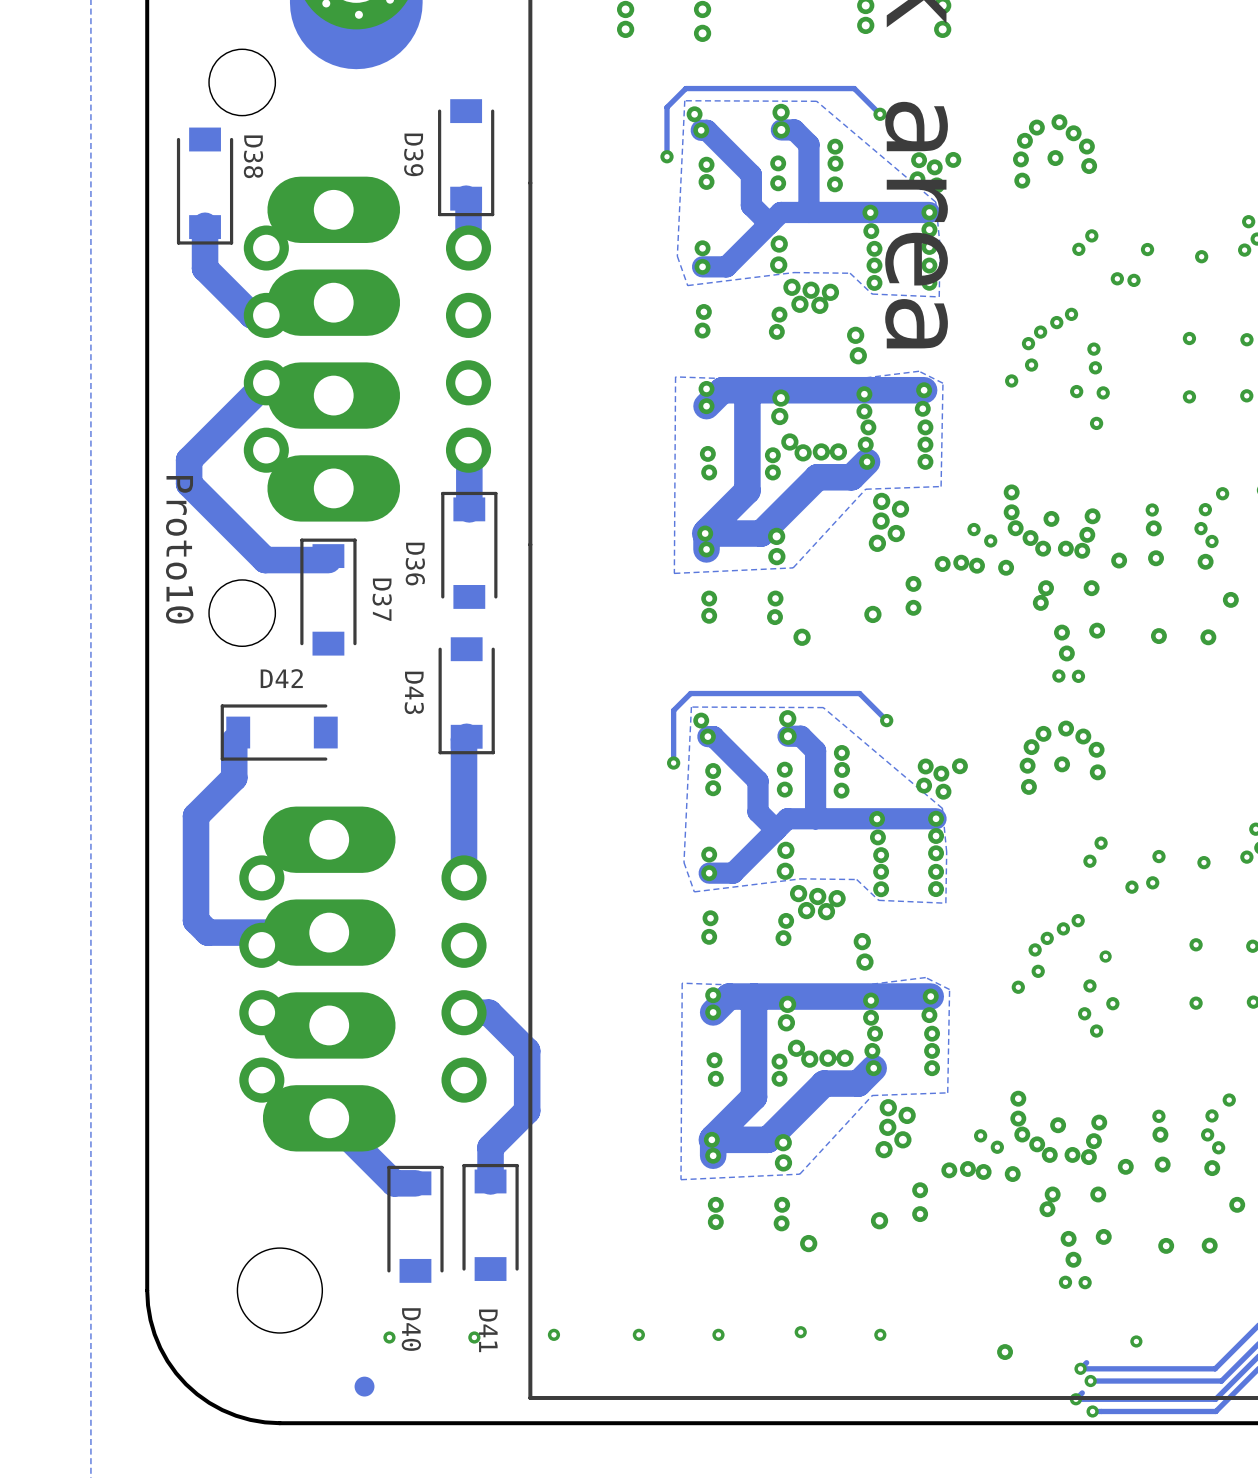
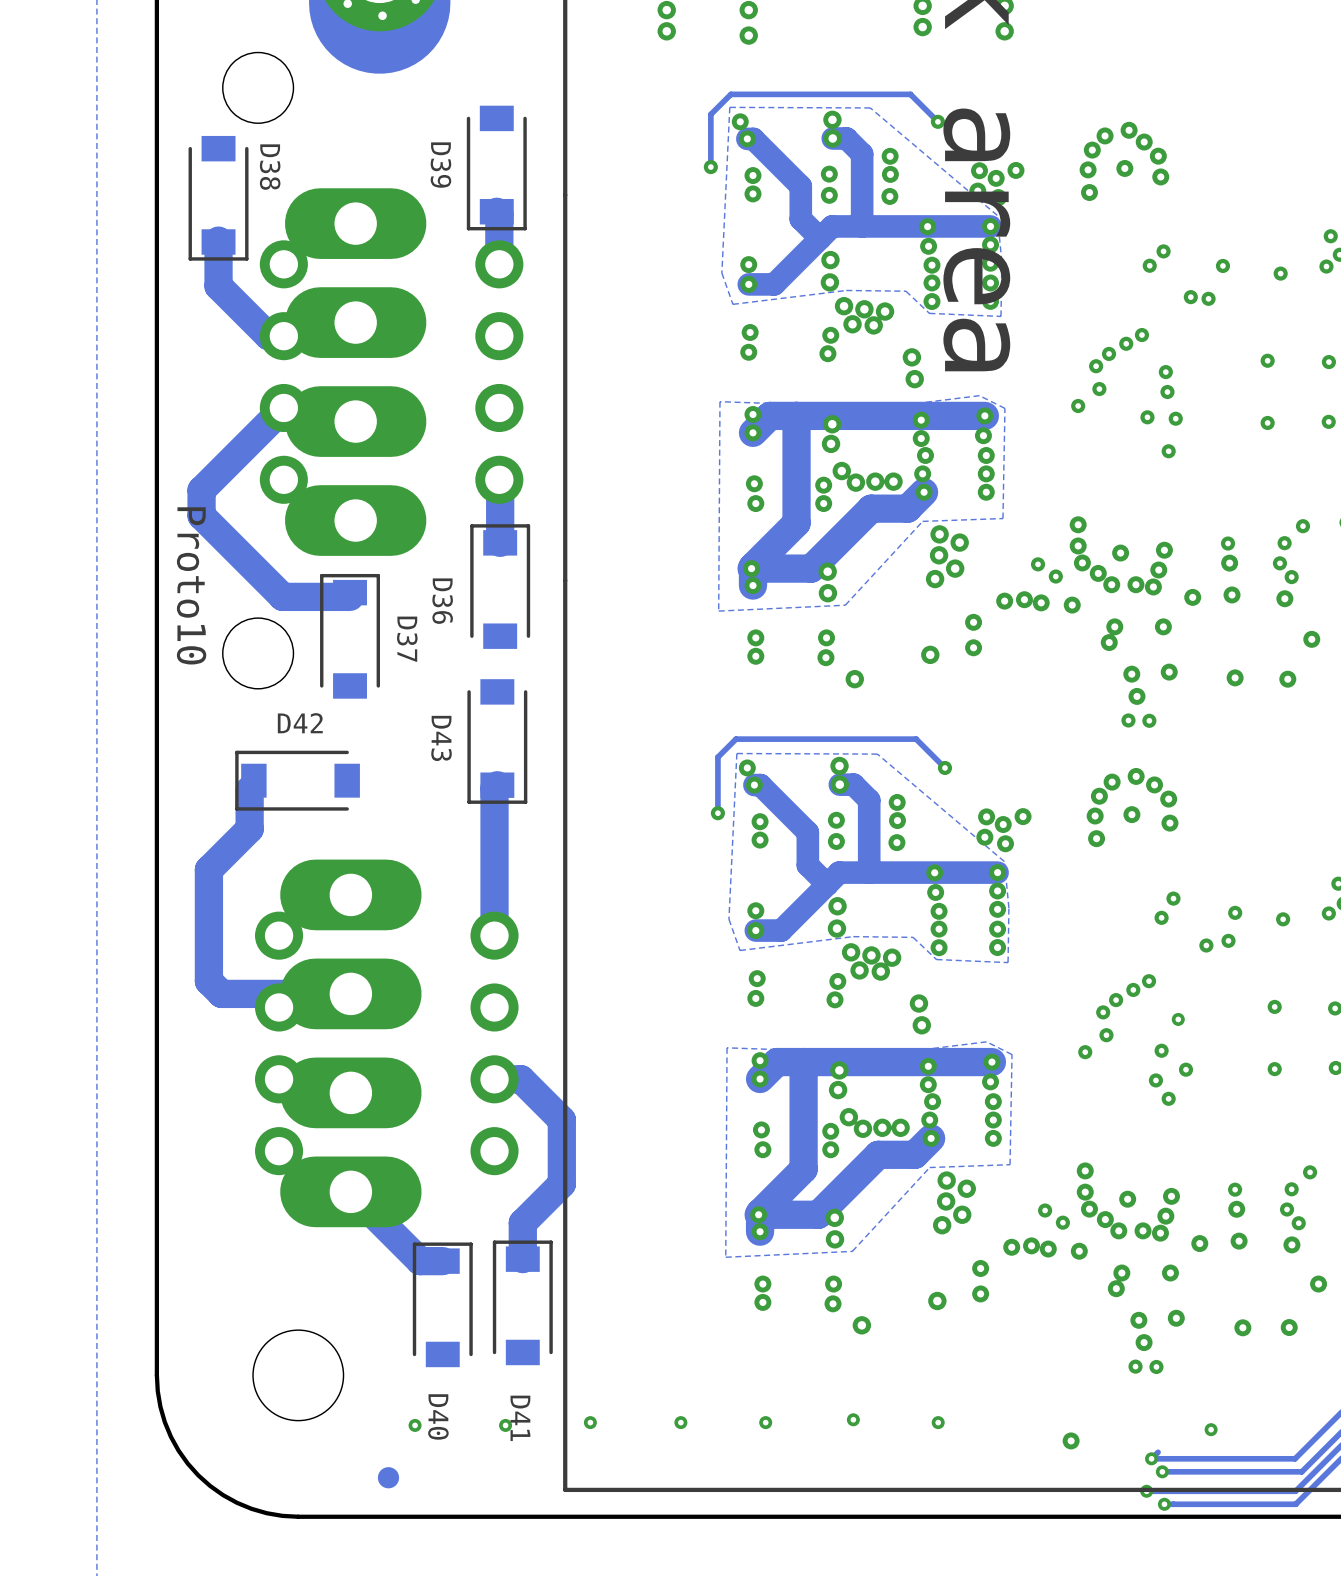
track: (1082, 1392) (1075, 1399) -> none

